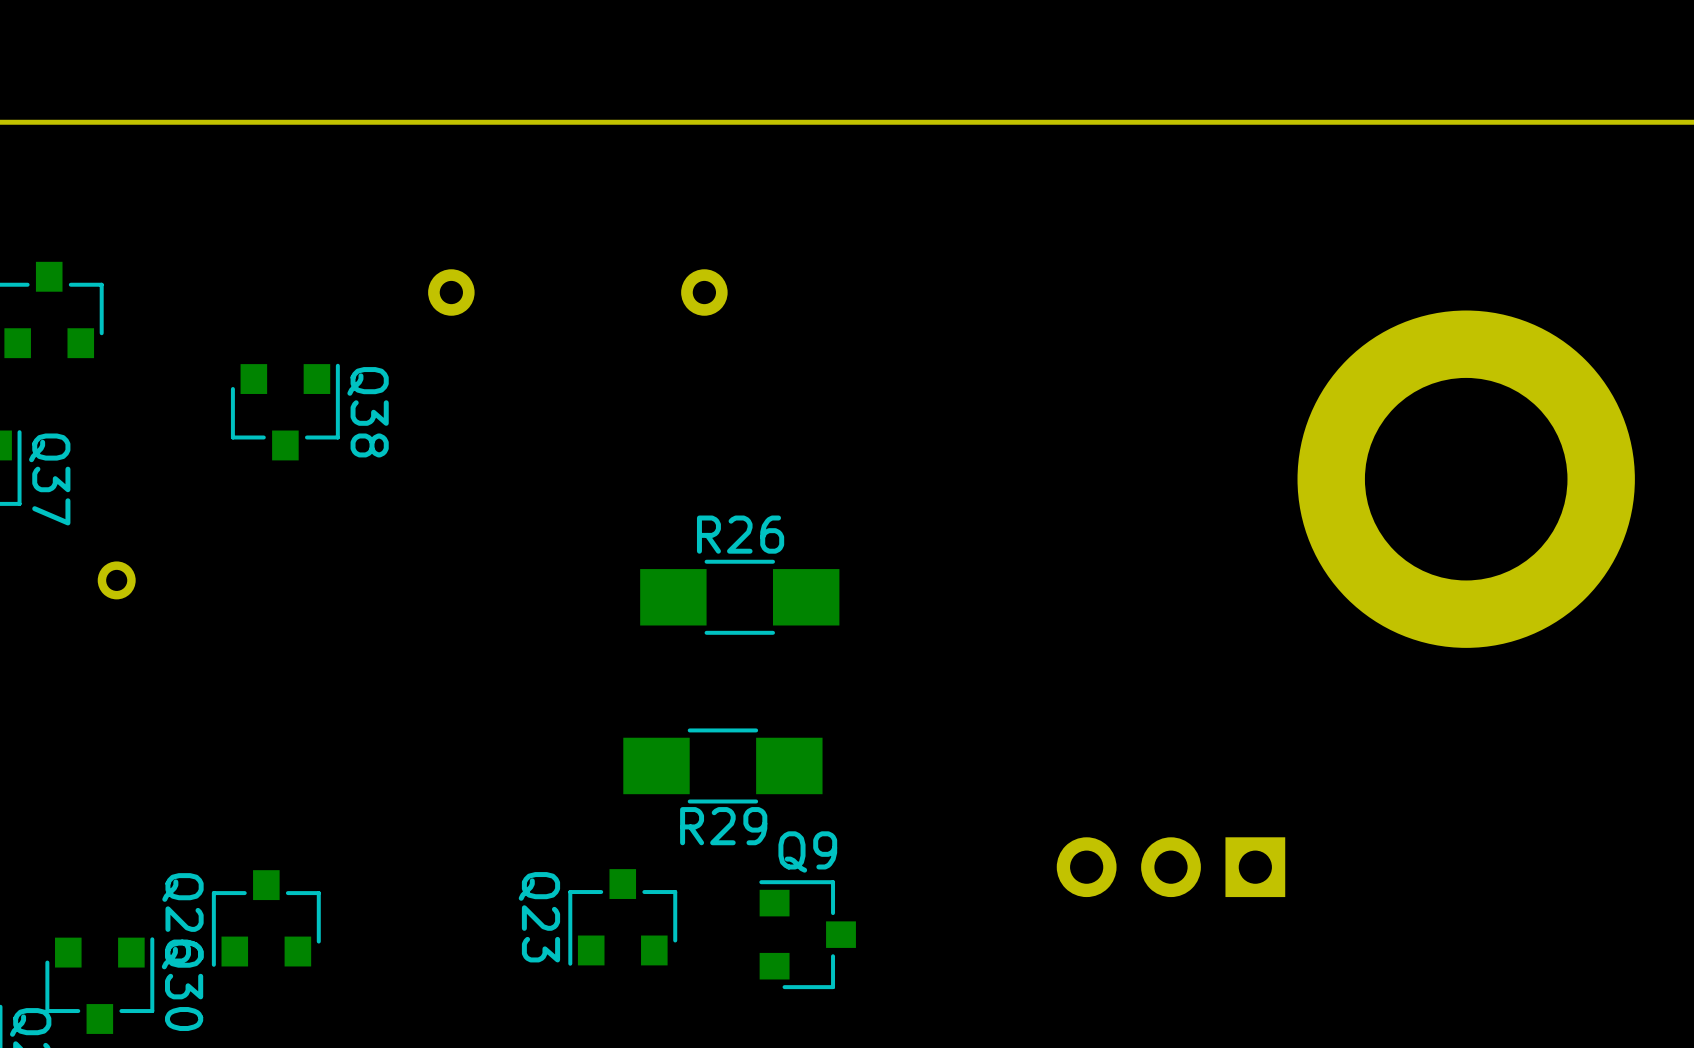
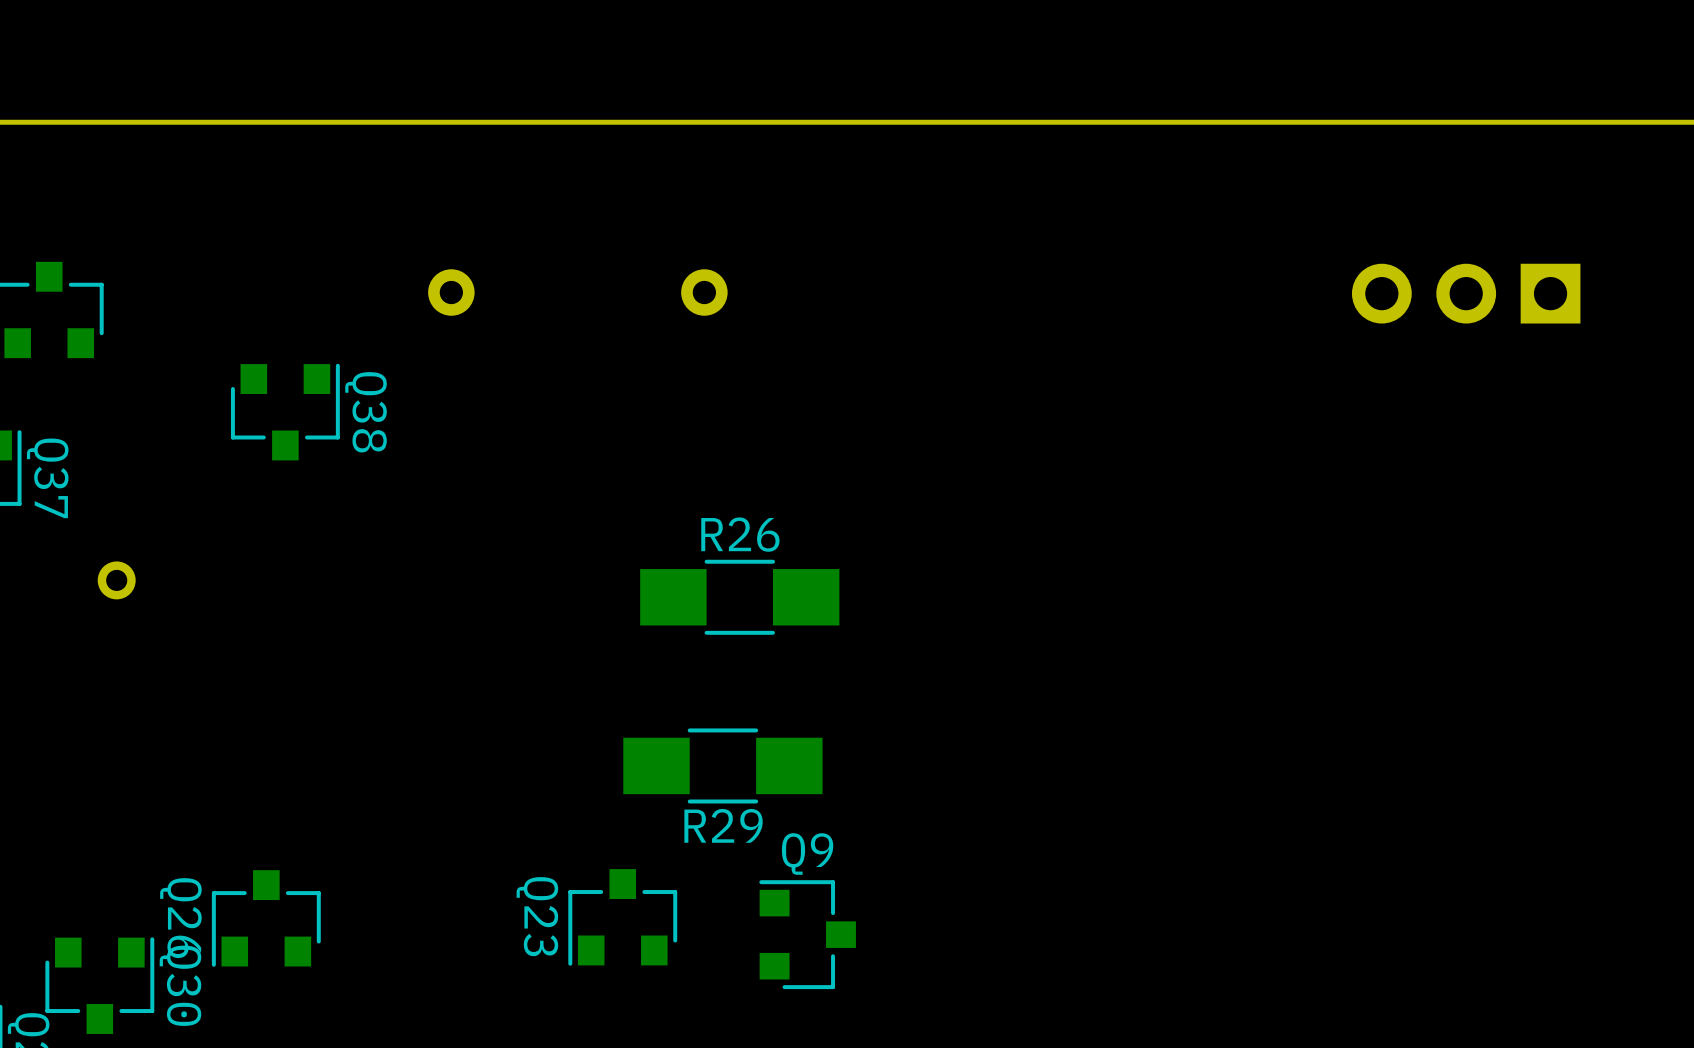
part: (1466, 479) -> none
part position: (1171, 867) -> (1466, 293)

